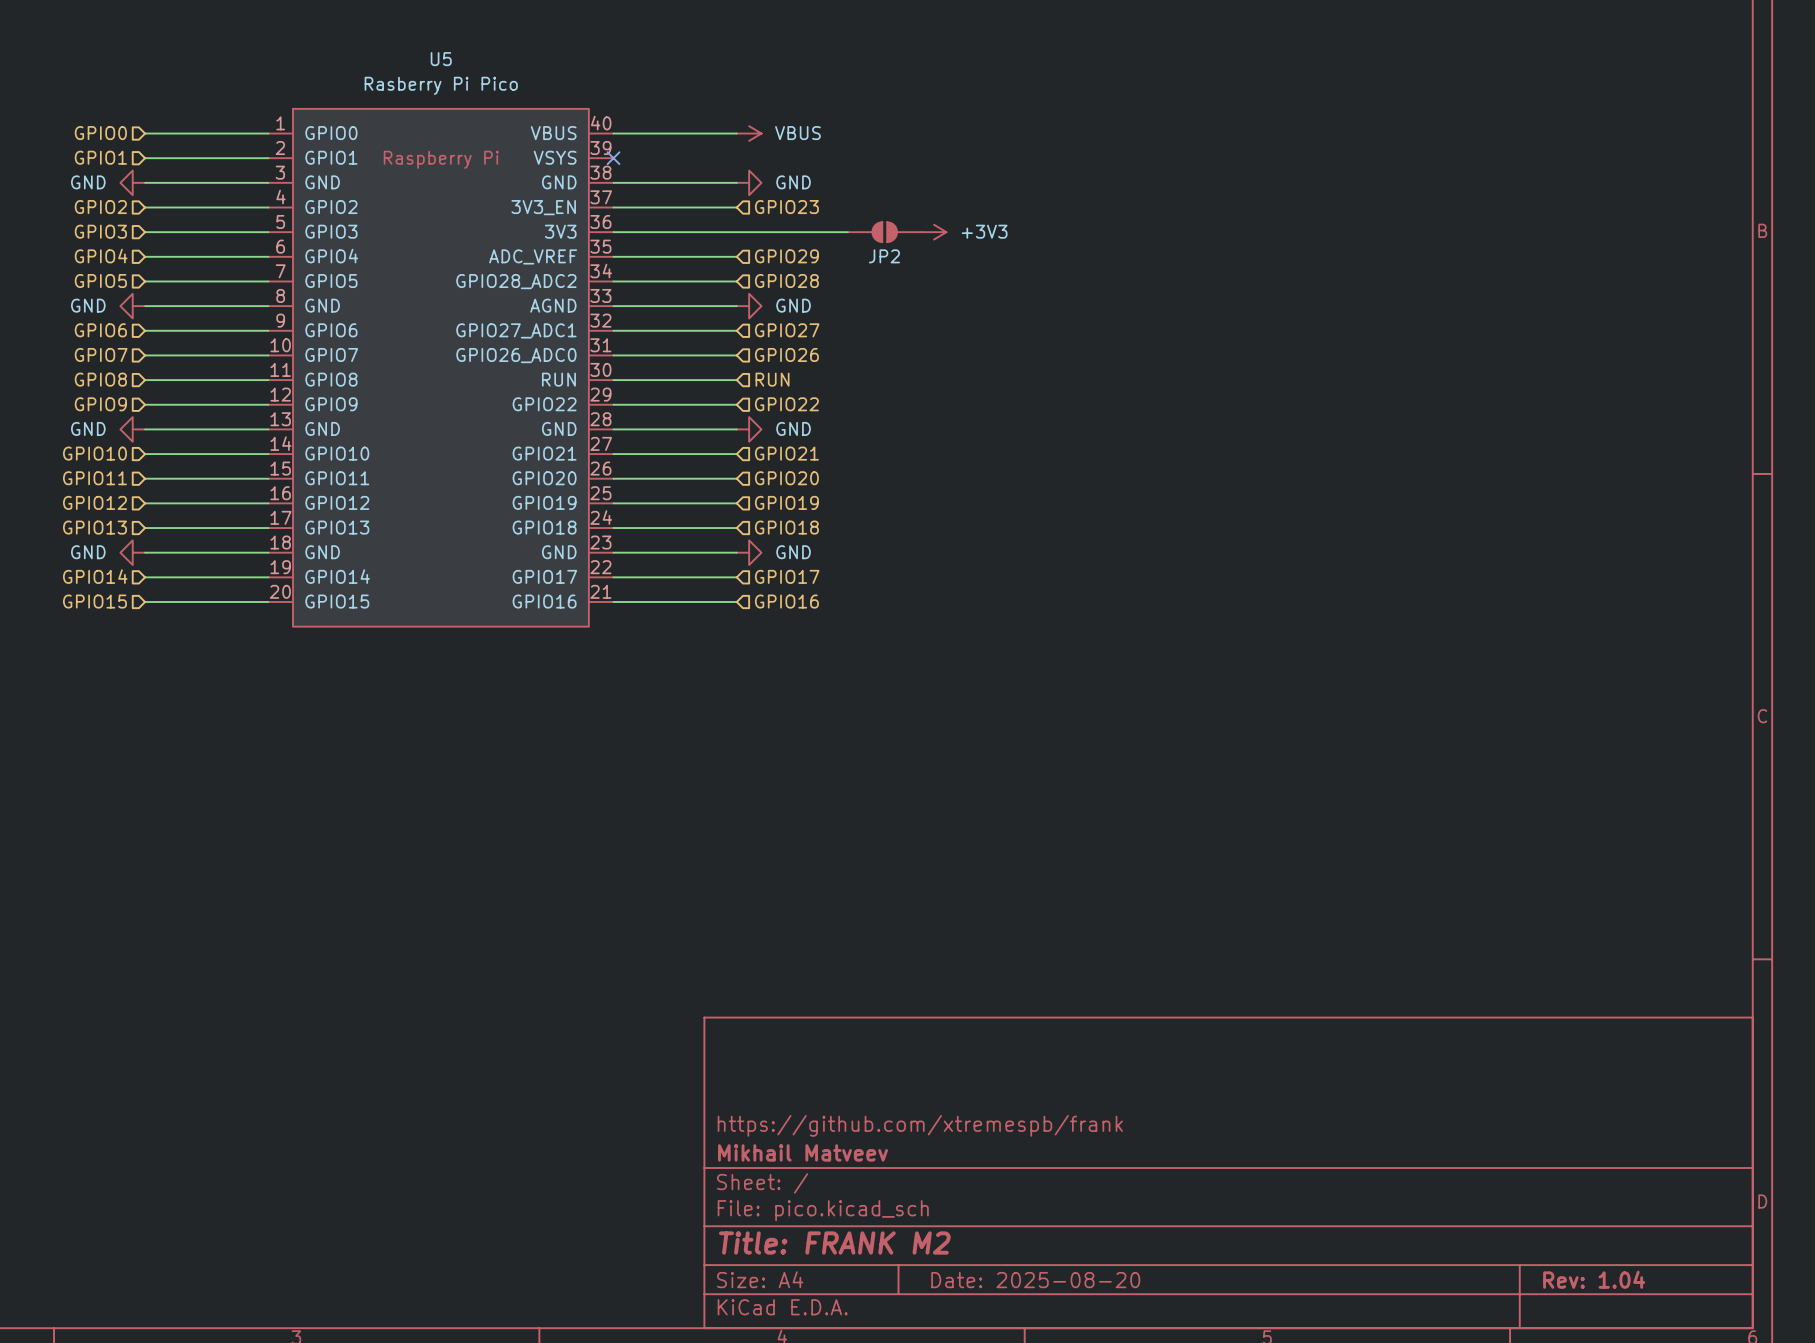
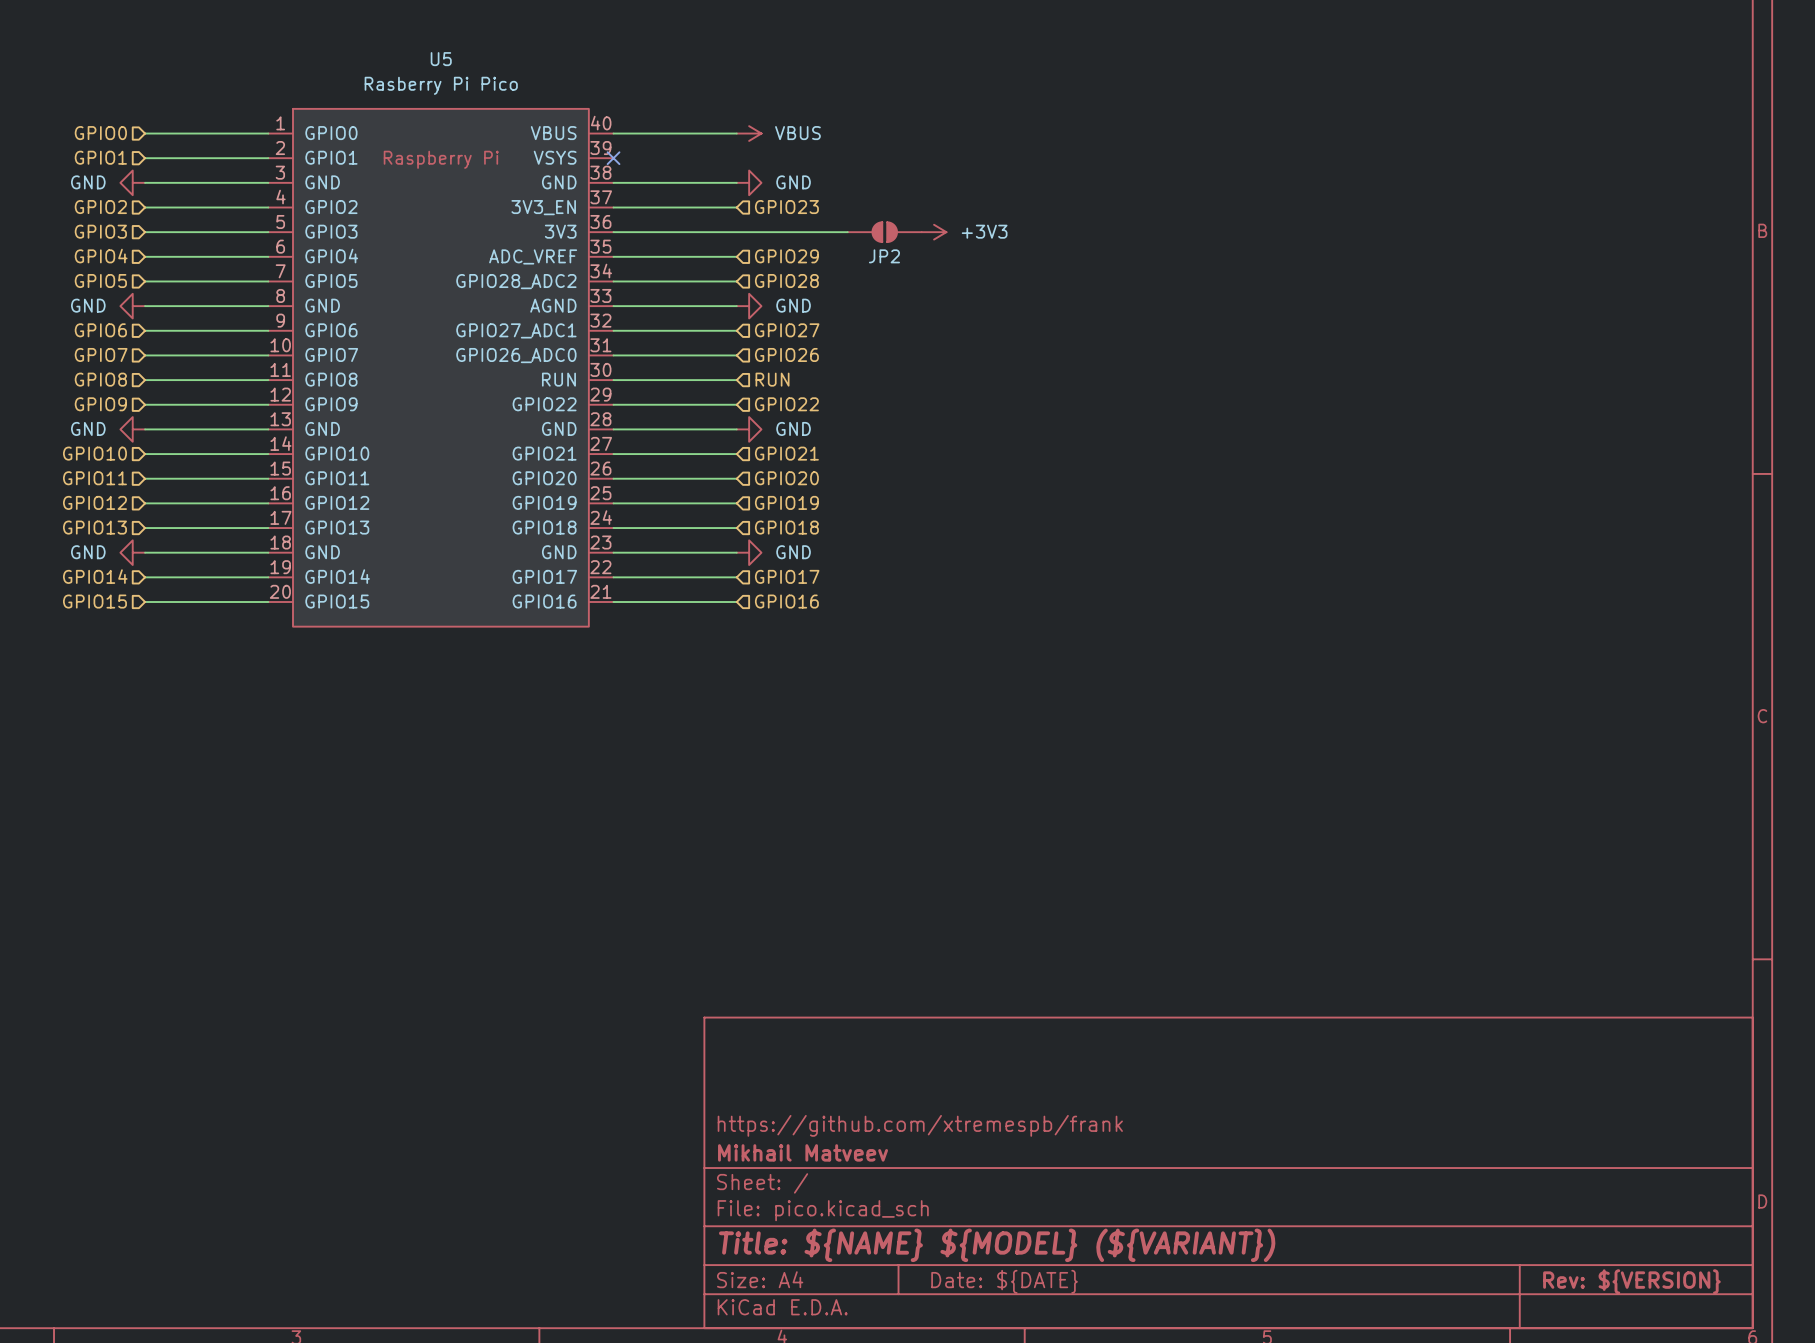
title block: Title: FRANK M2 (834, 1243) -> Title: ${NAME} ${MODEL} (${VARIANT}) (997, 1245)
title block: Rev: 1.04 (1594, 1279) -> Rev: ${VERSION} (1631, 1281)
title block: Date: 2025-08-20 (1035, 1280) -> Date: ${DATE} (1004, 1281)

